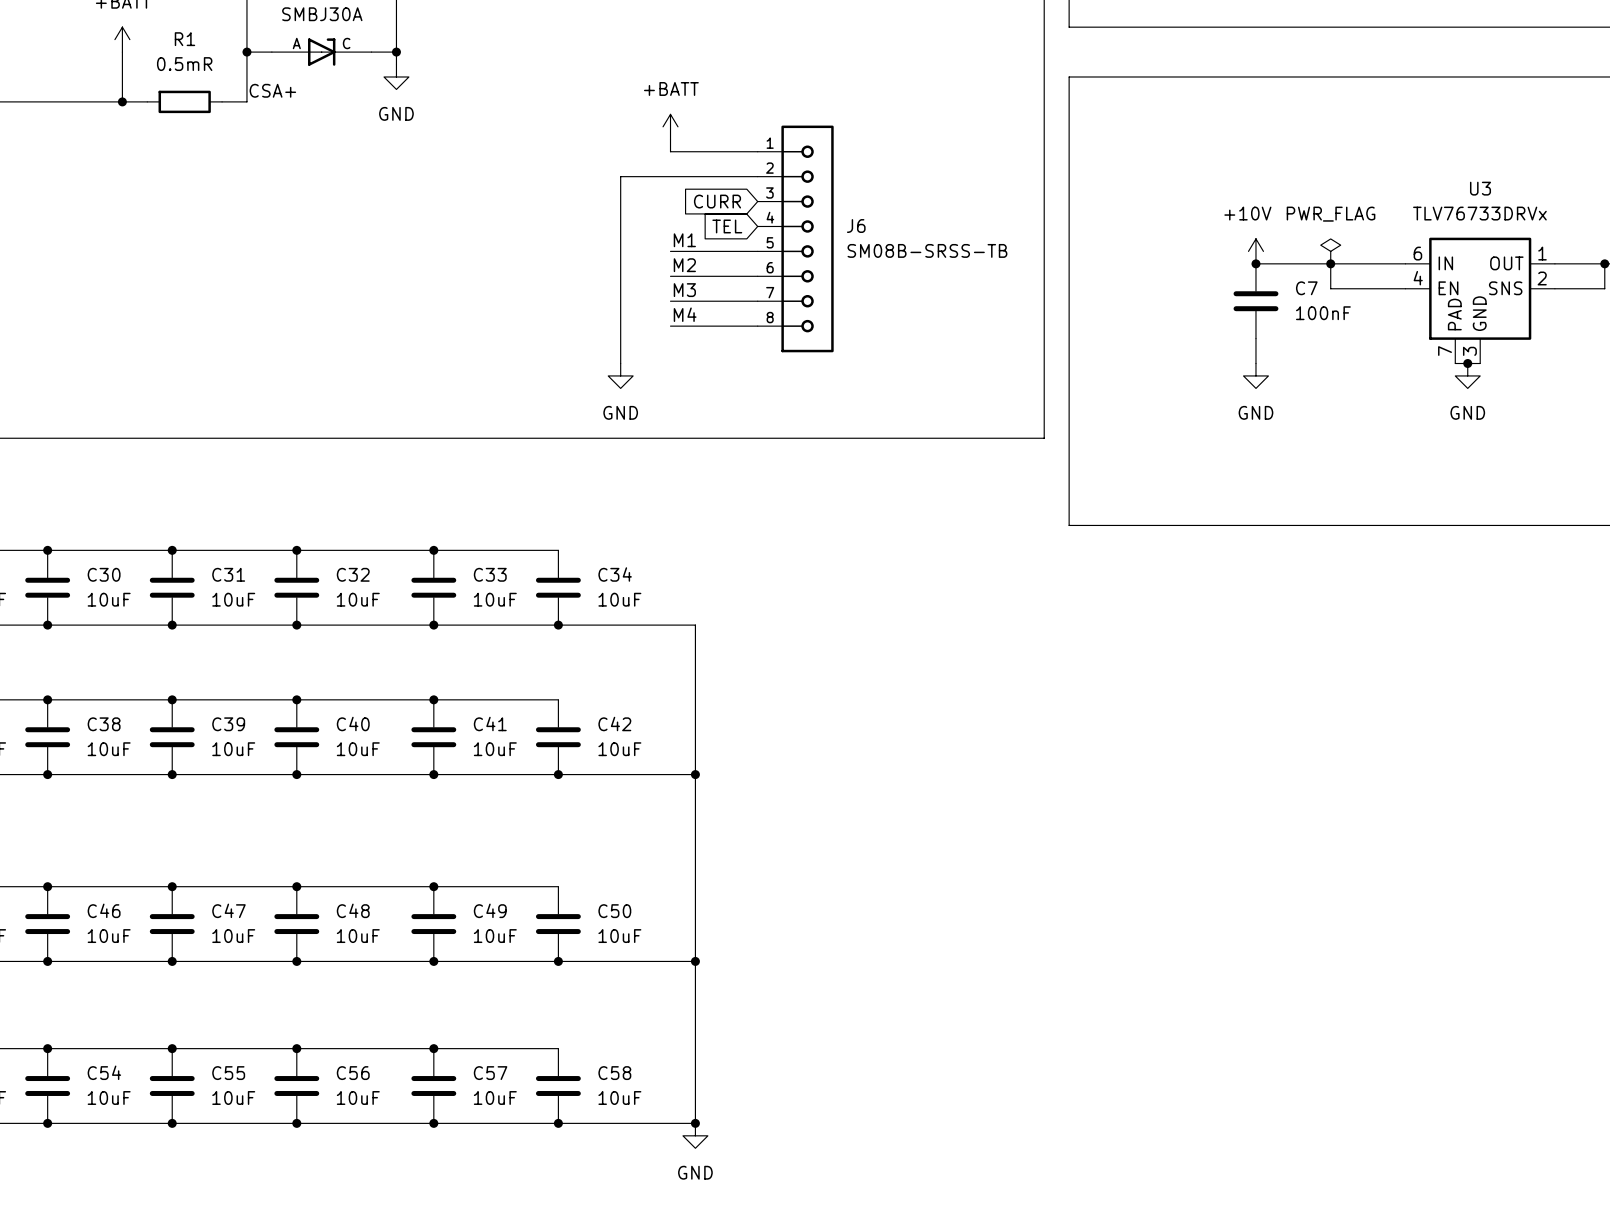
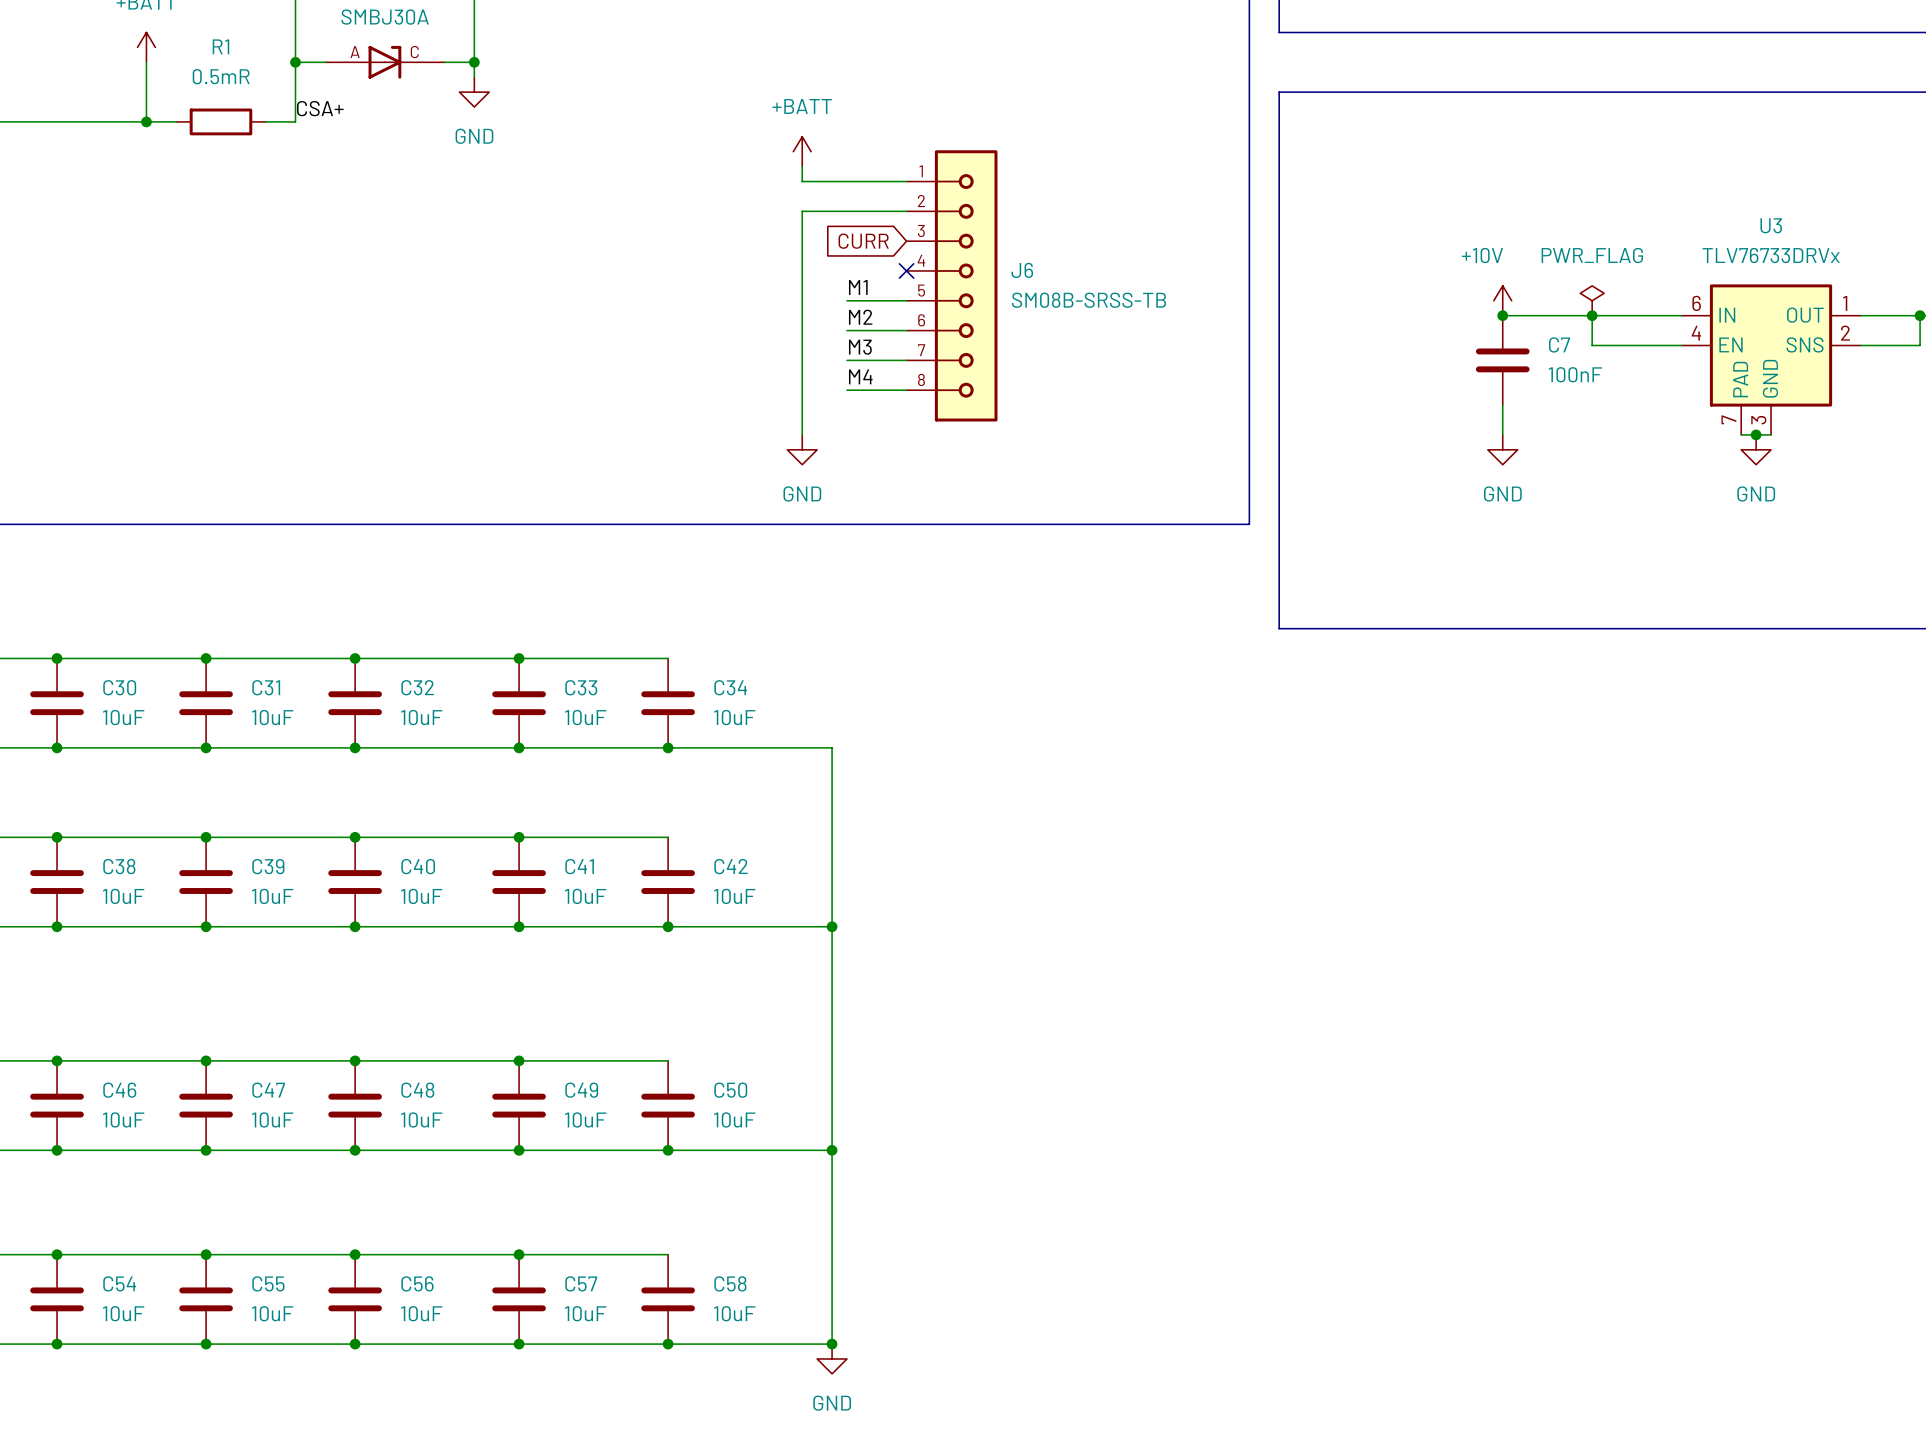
wire: (670, 176) (620, 176) (620, 363) -> (802, 211) (802, 434)
global label: TEL (727, 226) -> none
no-connect mark: none -> (906, 270)
label position: M1 (684, 240) -> M1 (858, 287)
wire: (670, 251) (707, 251) -> none
label position: M2 (684, 265) -> M2 (860, 317)
wire: (670, 276) (707, 276) -> none
label position: M3 (684, 290) -> M3 (860, 347)
wire: (670, 301) (707, 301) -> none
label position: M4 (685, 314) -> M4 (860, 376)
wire: (670, 326) (707, 326) -> none
power symbol position: GND (620, 375) -> GND (802, 449)

